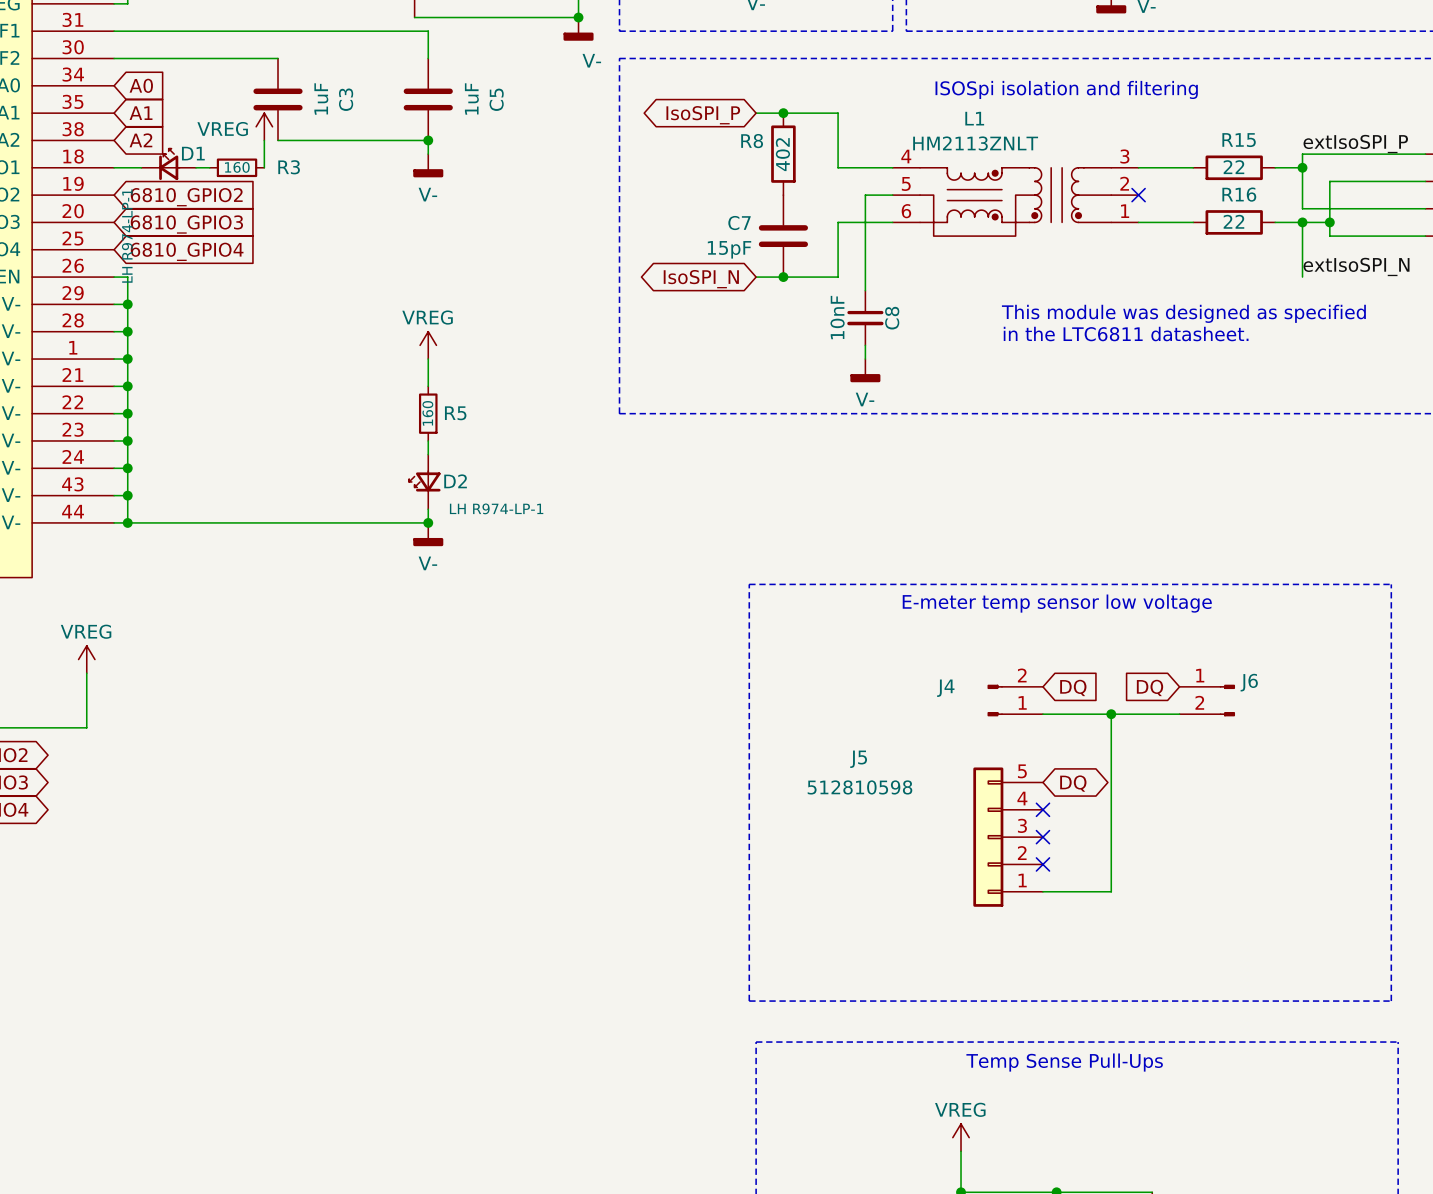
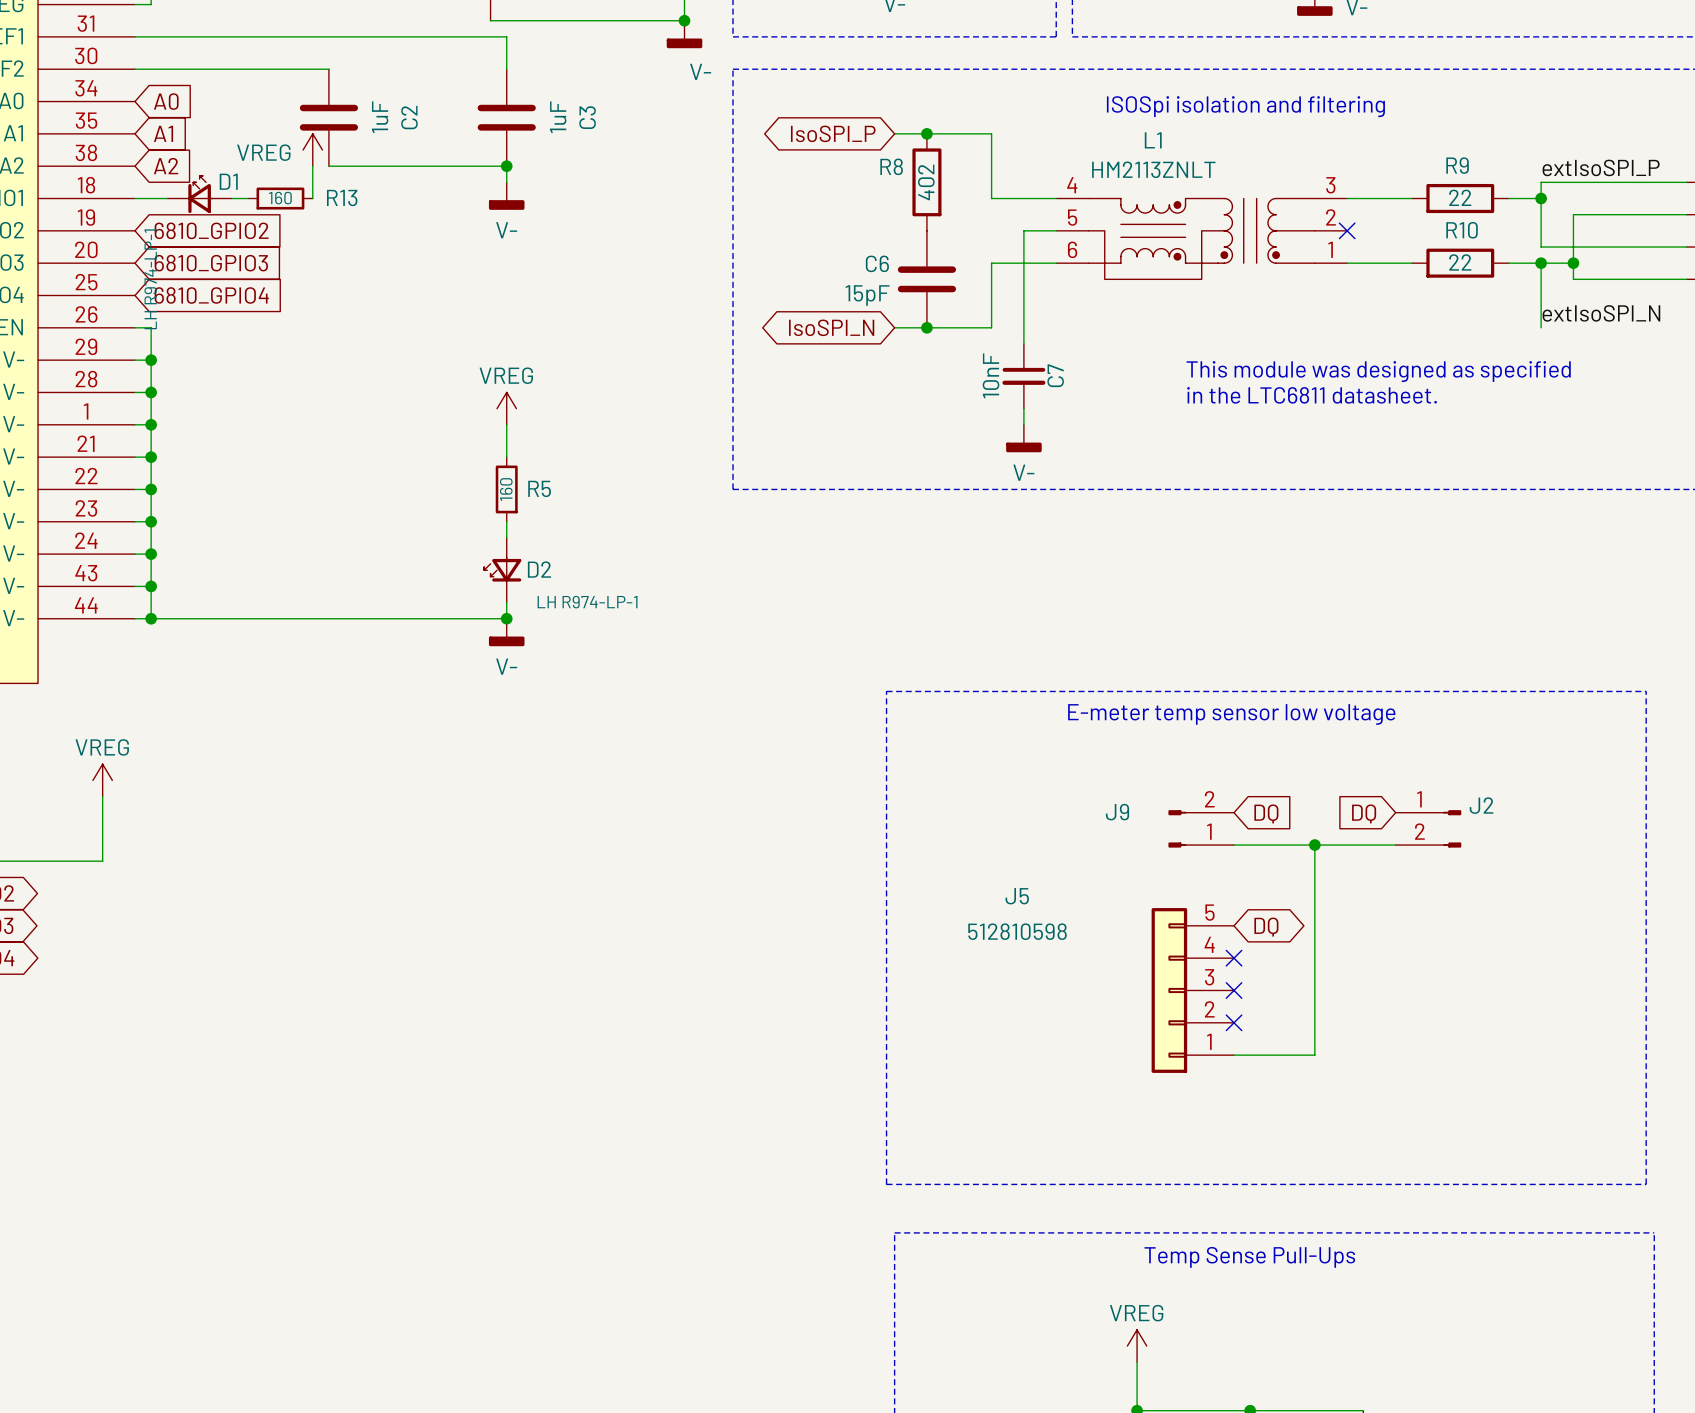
C3 name: C3 (346, 99) -> C2 (409, 117)
C5 name: C5 (496, 99) -> C3 (587, 117)
R15 name: R15 (1239, 140) -> R9 (1457, 165)
R3 name: R3 (289, 167) -> R13 (342, 198)
R16 name: R16 (1239, 194) -> R10 (1462, 230)
C7 name: C7 (739, 223) -> C6 (877, 263)
C8 name: C8 (892, 318) -> C7 (1055, 375)
J6 name: J6 (1249, 682) -> J2 (1481, 805)
J4 name: J4 (945, 688) -> J9 (1117, 812)

